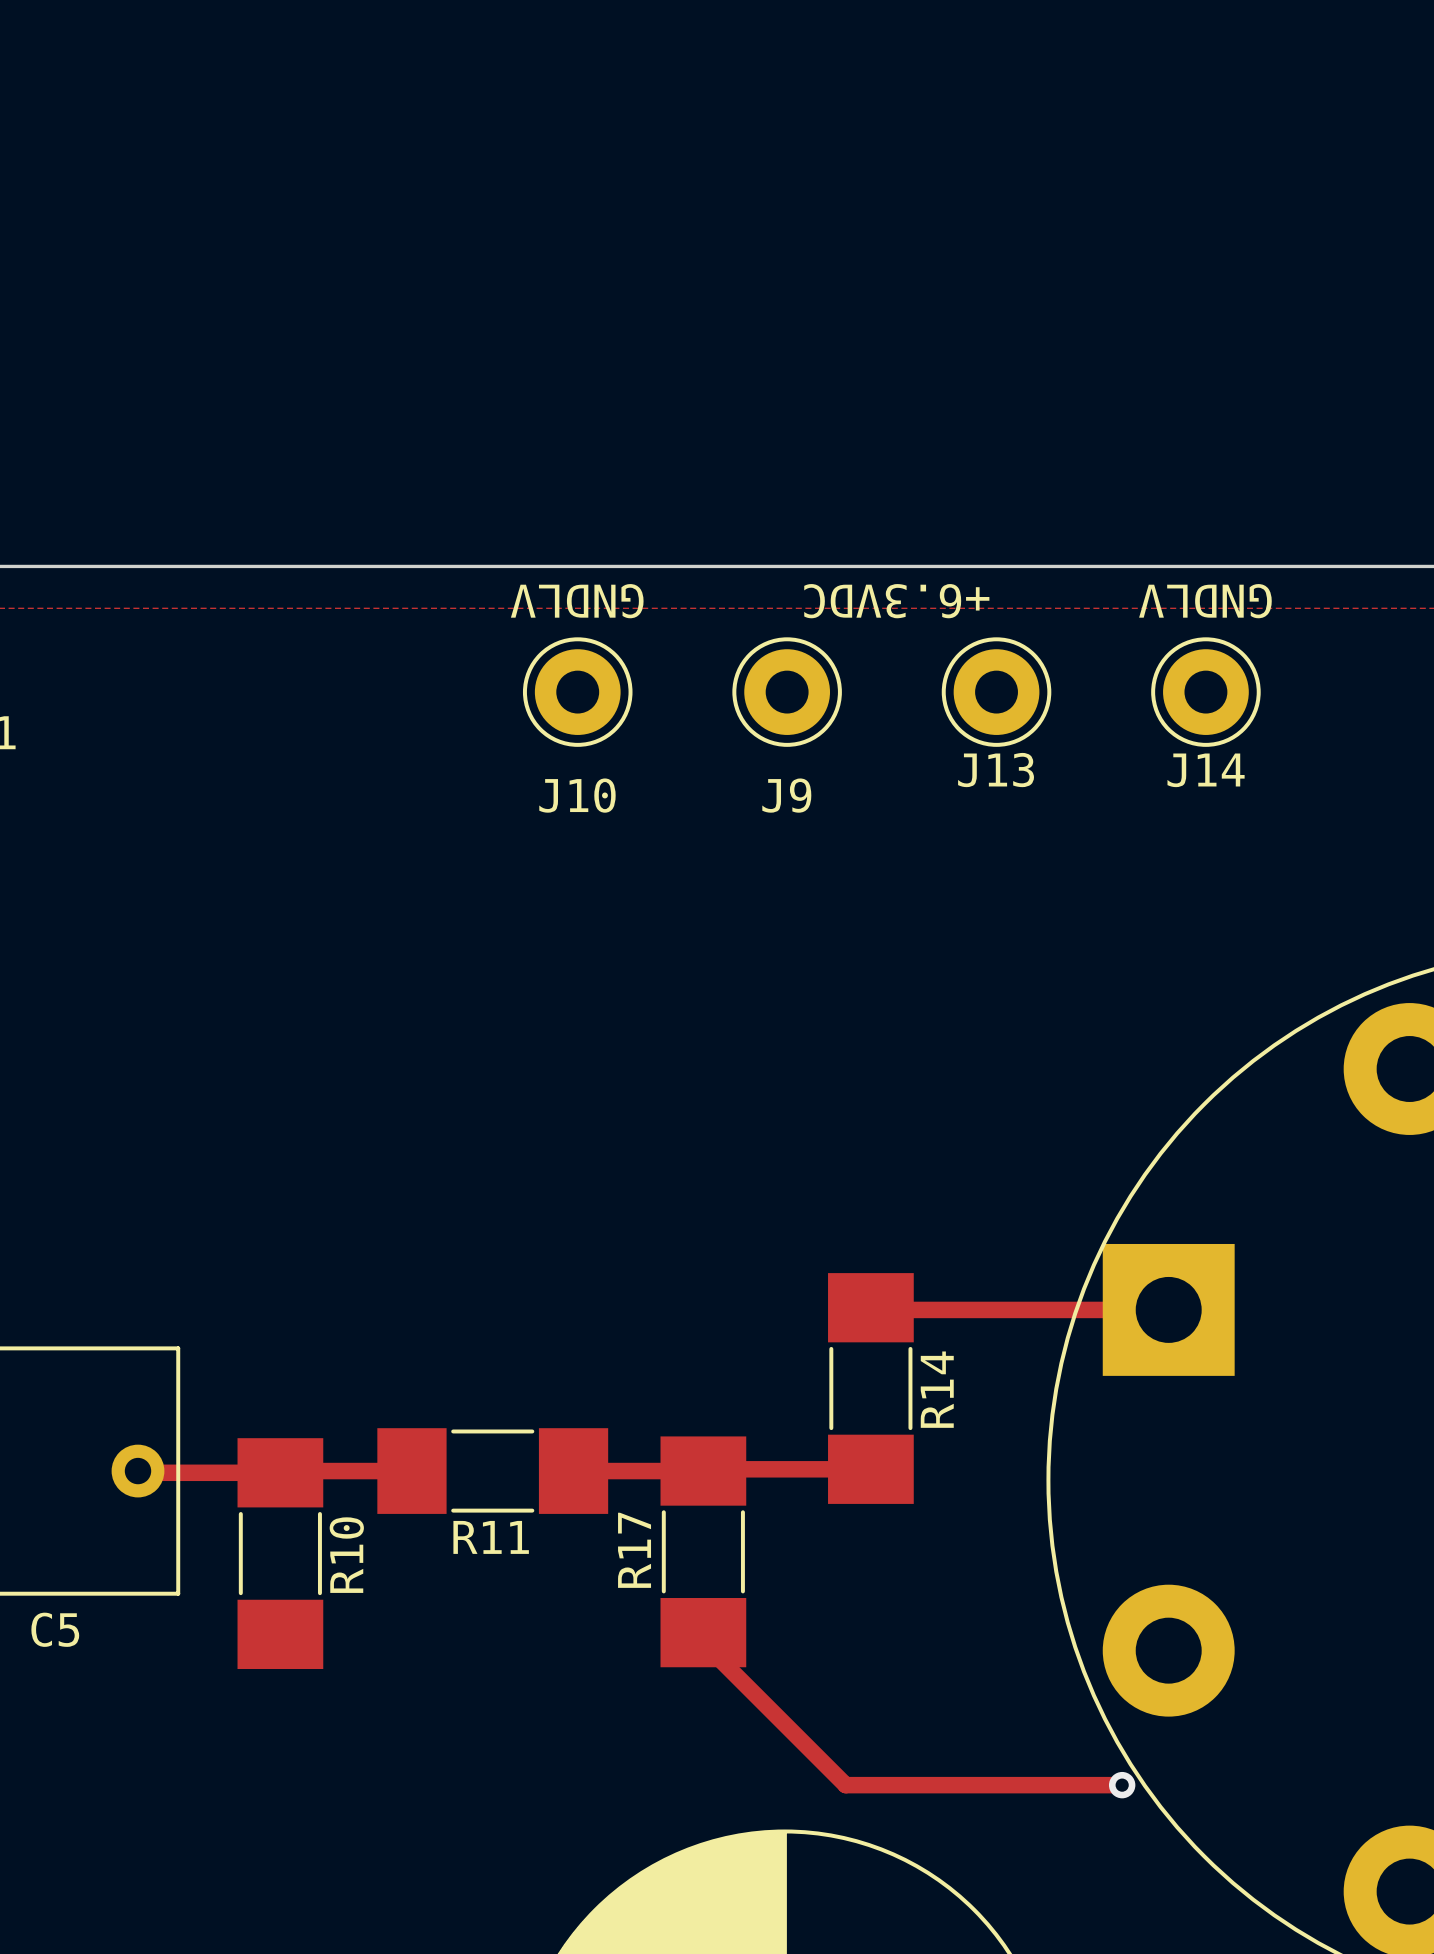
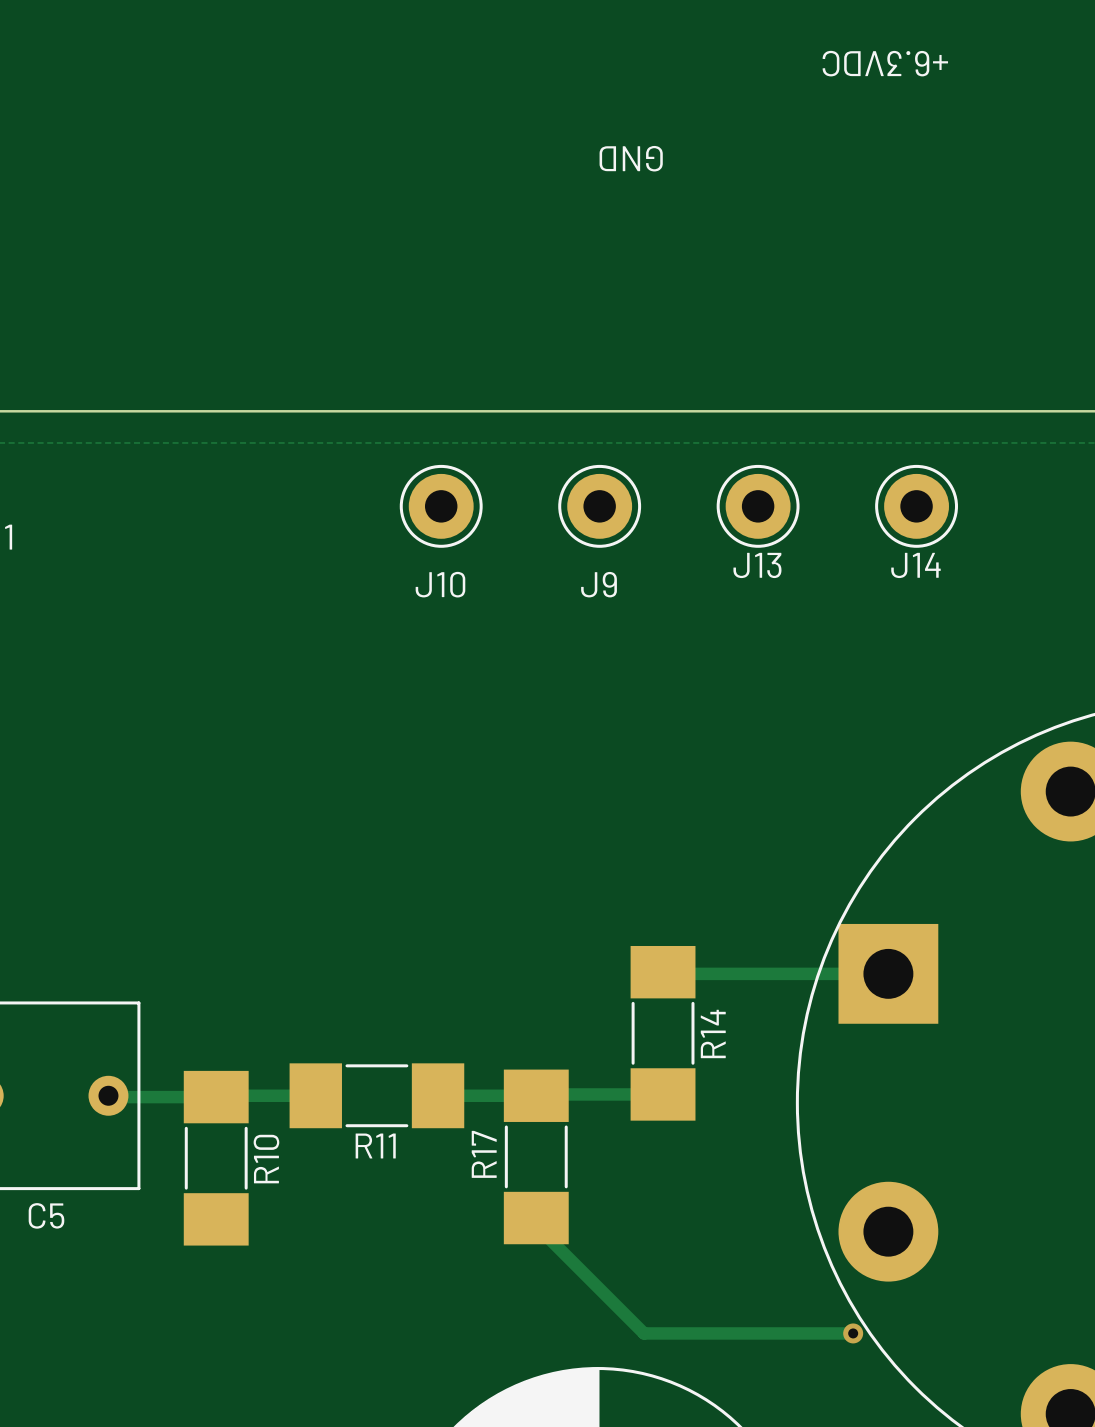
text: none -> GND (631, 158)
text: GNDLV (577, 601) -> none
text position: +6.3VDC (896, 601) -> +6.3VDC (885, 63)
text: GNDLV (1205, 601) -> none

